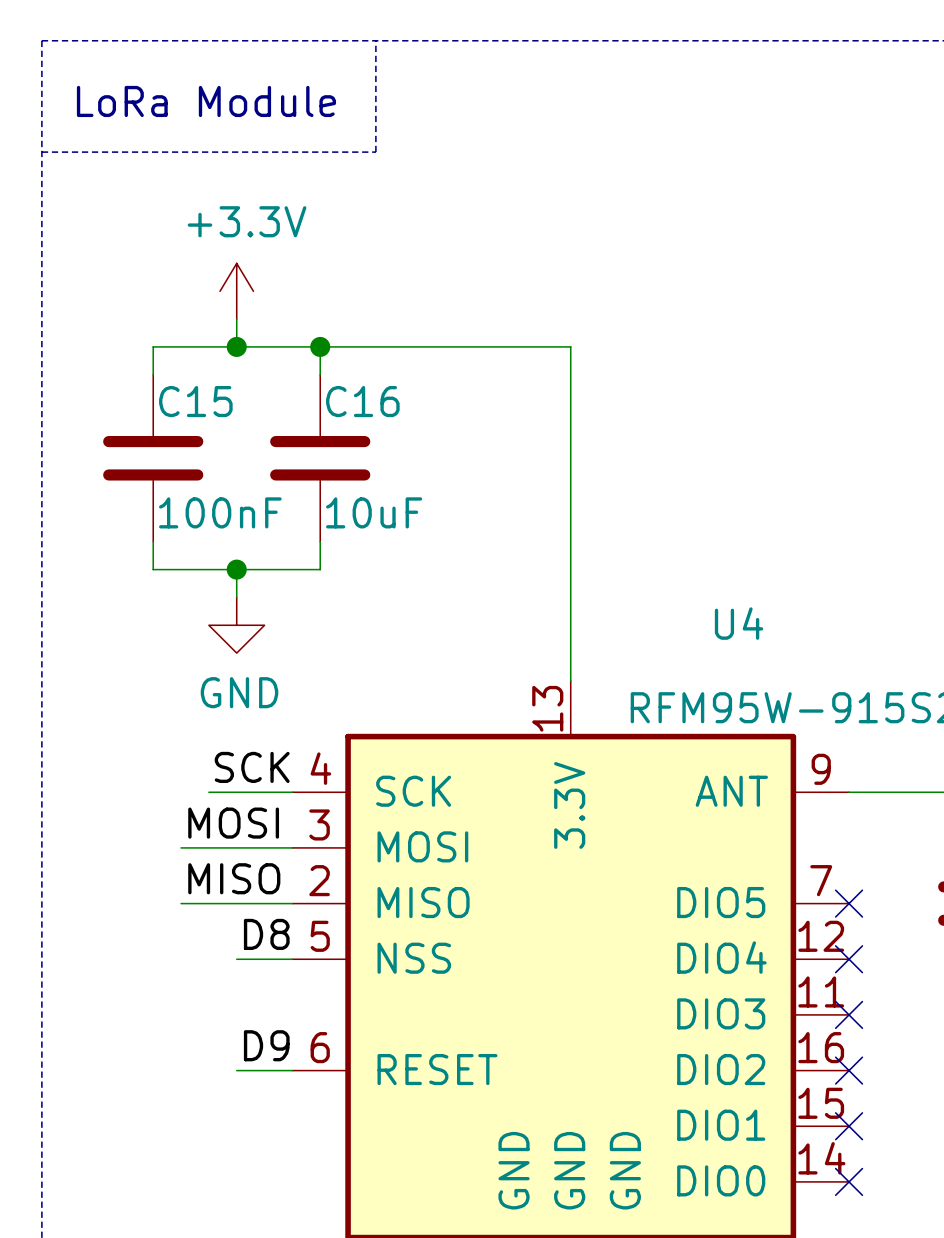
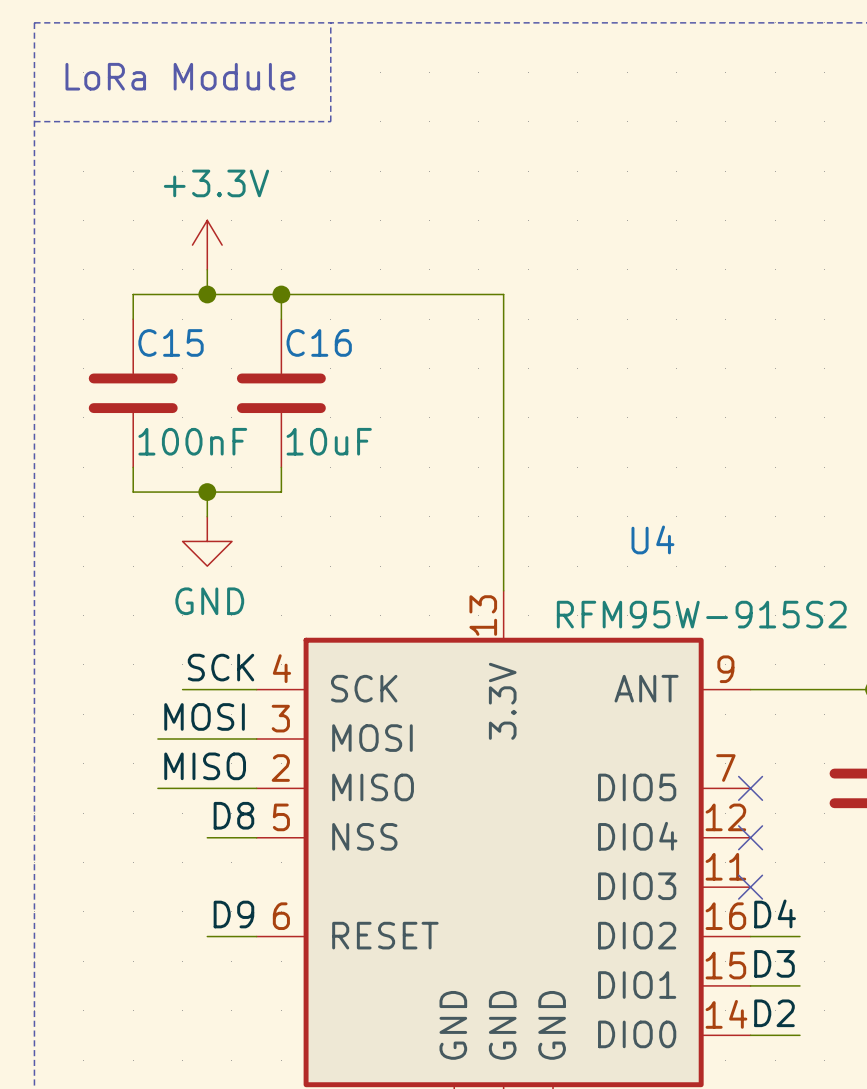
label: none -> D4 (775, 913)
wire: none -> (750, 936) (799, 936)
no-connect mark: (849, 1070) -> none
label: none -> D3 (774, 963)
wire: none -> (750, 985) (799, 985)
no-connect mark: (849, 1126) -> none
label: none -> D2 (774, 1013)
wire: none -> (750, 1035) (799, 1035)
no-connect mark: (849, 1181) -> none

